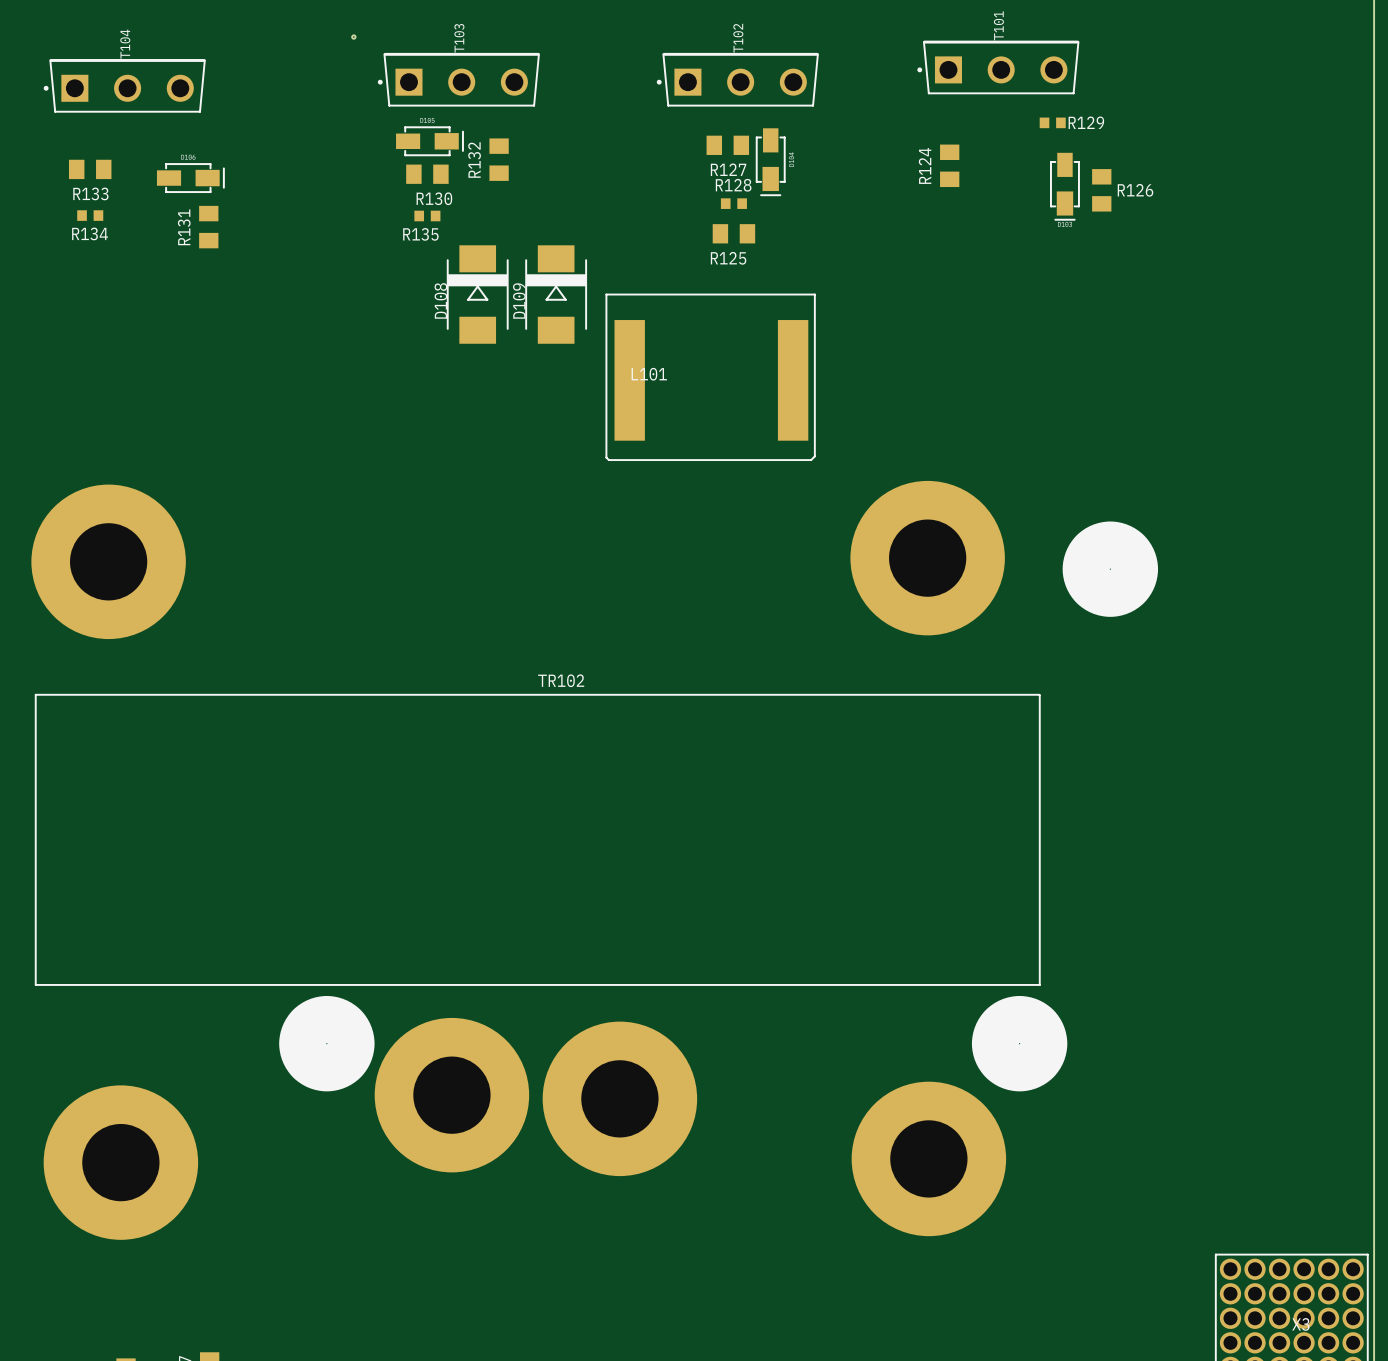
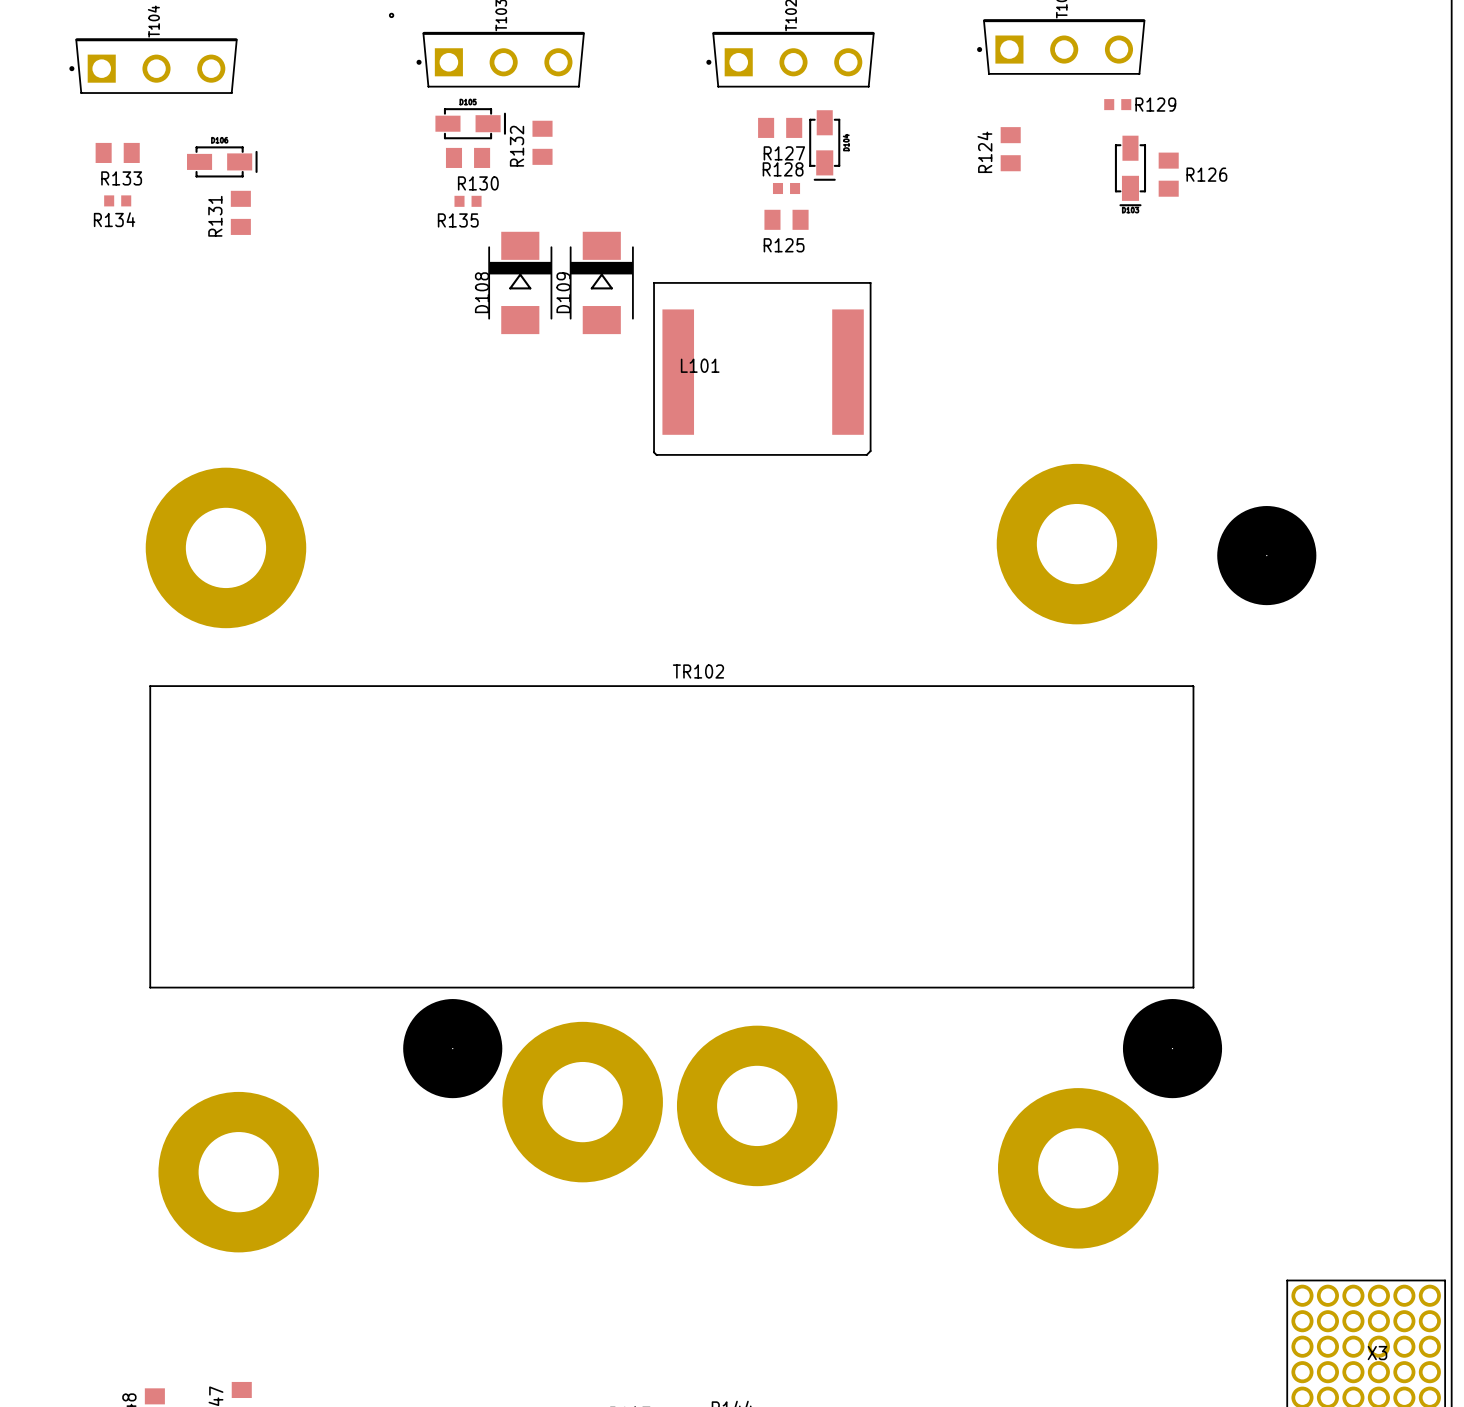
TR102 position: (594, 860) -> (731, 858)

